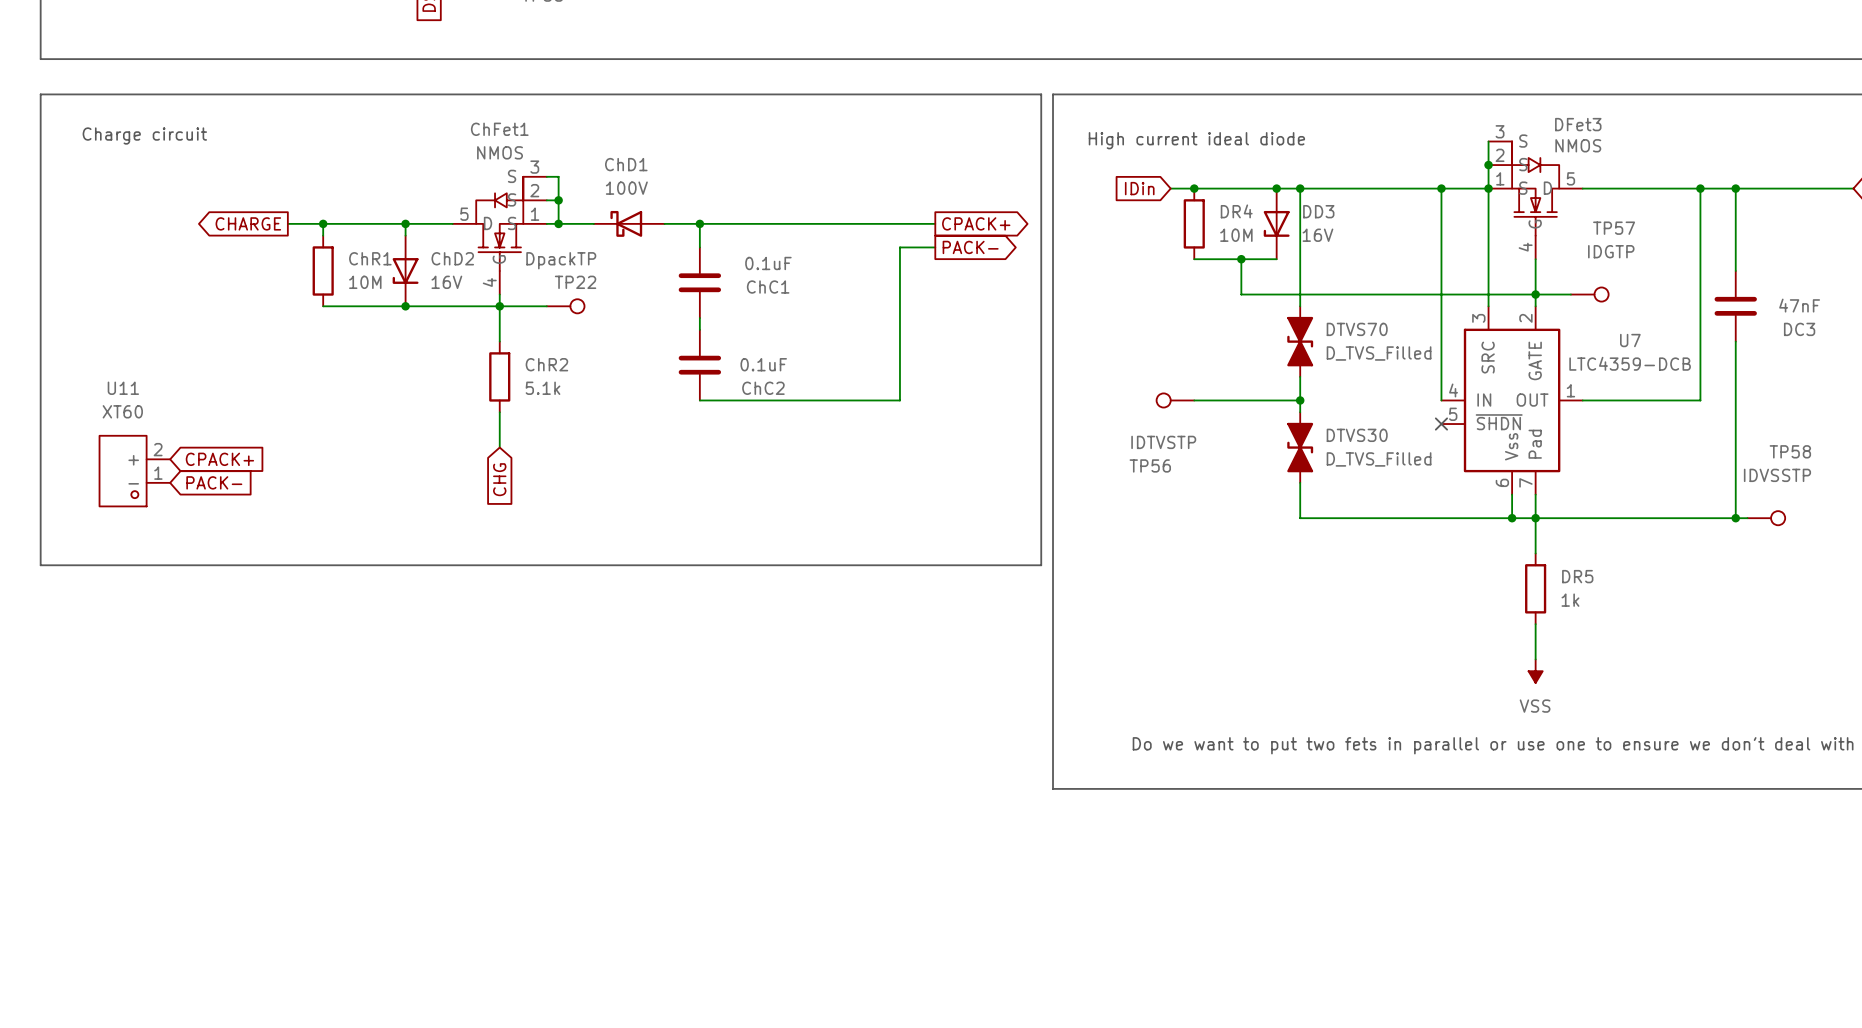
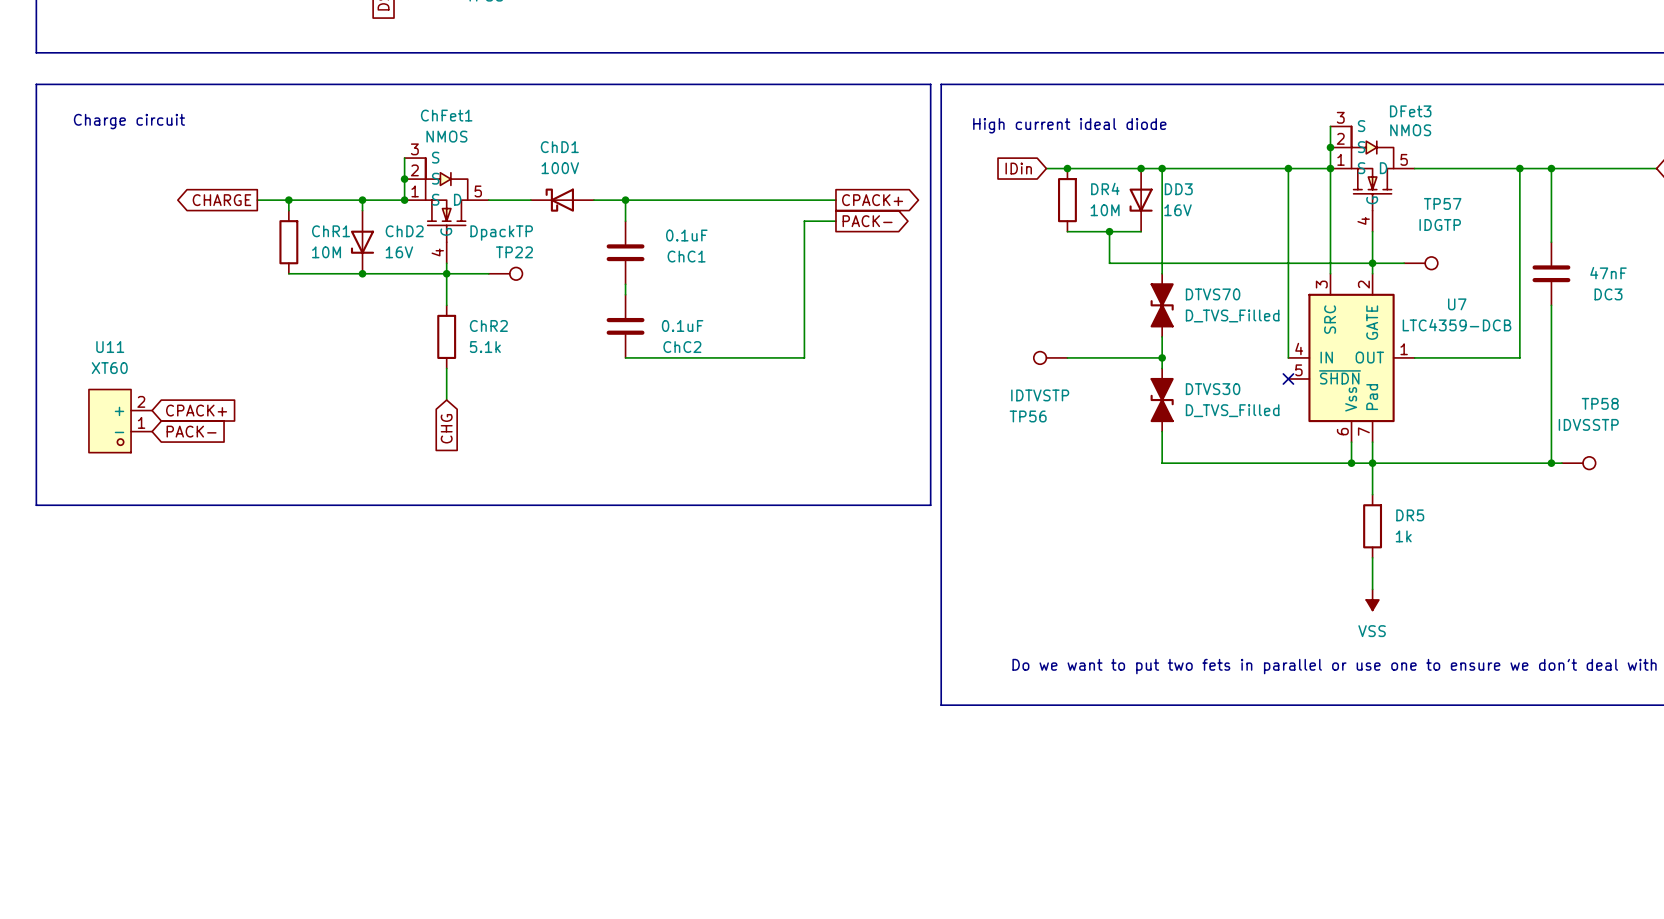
wire: none -> (404, 158) (404, 200)
wire: (546, 176) (558, 176) (558, 223) -> none
junction: none -> (404, 179)
wire: (546, 200) (558, 200) -> none
junction: (558, 200) -> none
junction: none -> (404, 200)
ChFet1 flip: as is (499, 223) -> left-right (446, 200)
junction: (558, 223) -> none

